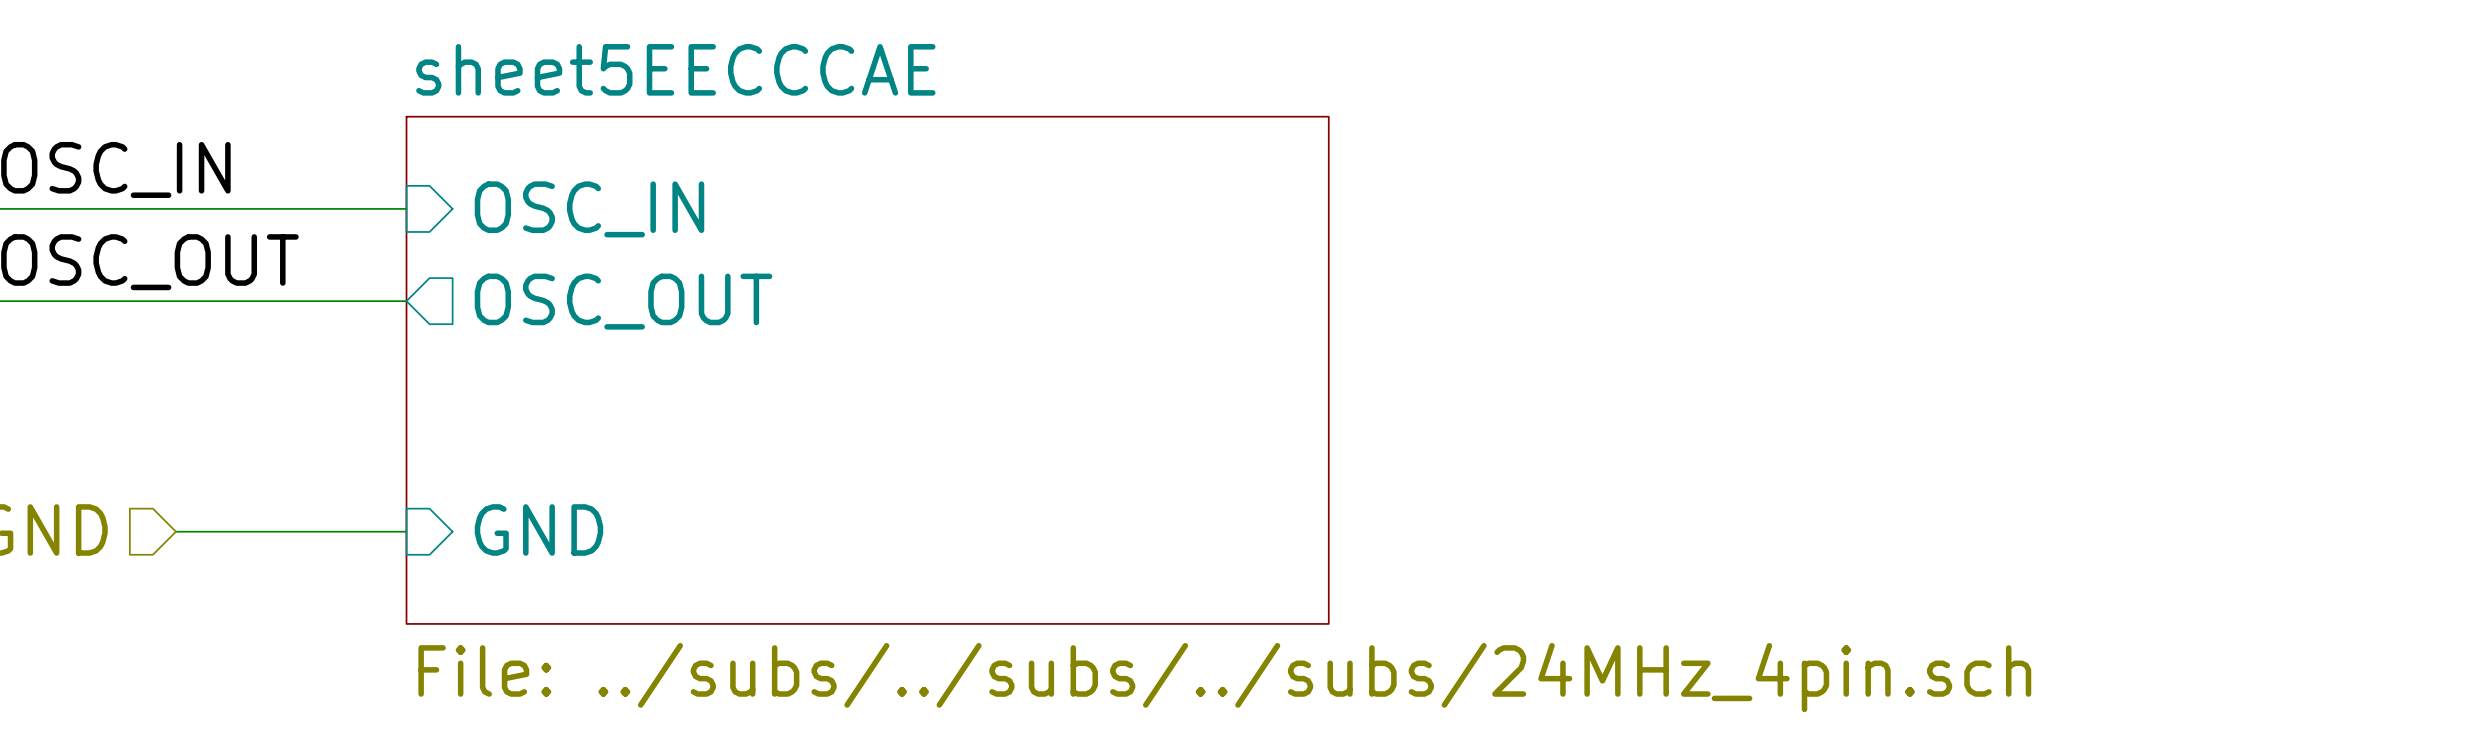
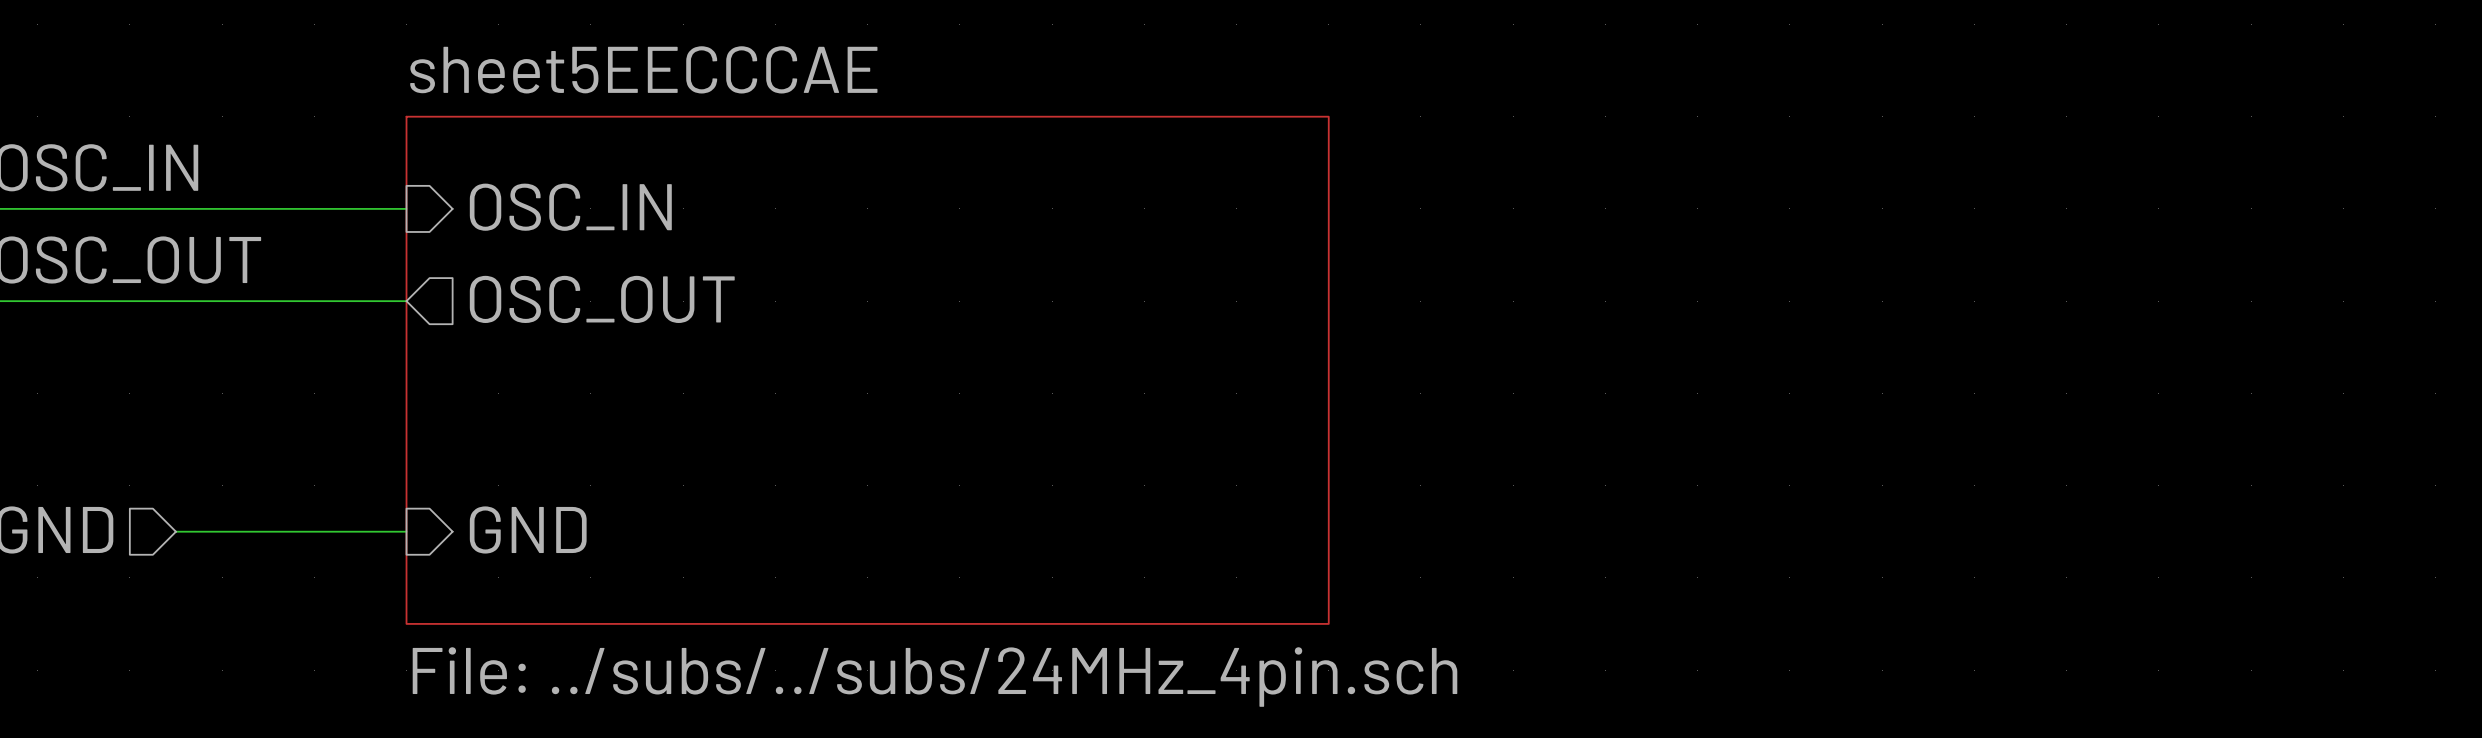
sheet sheet5EECCCAE value: File: ../subs/../subs/../subs/24MHz_4pin.sch (1224, 677) -> File: ../subs/../subs/24MHz_4pin.sch (934, 677)

